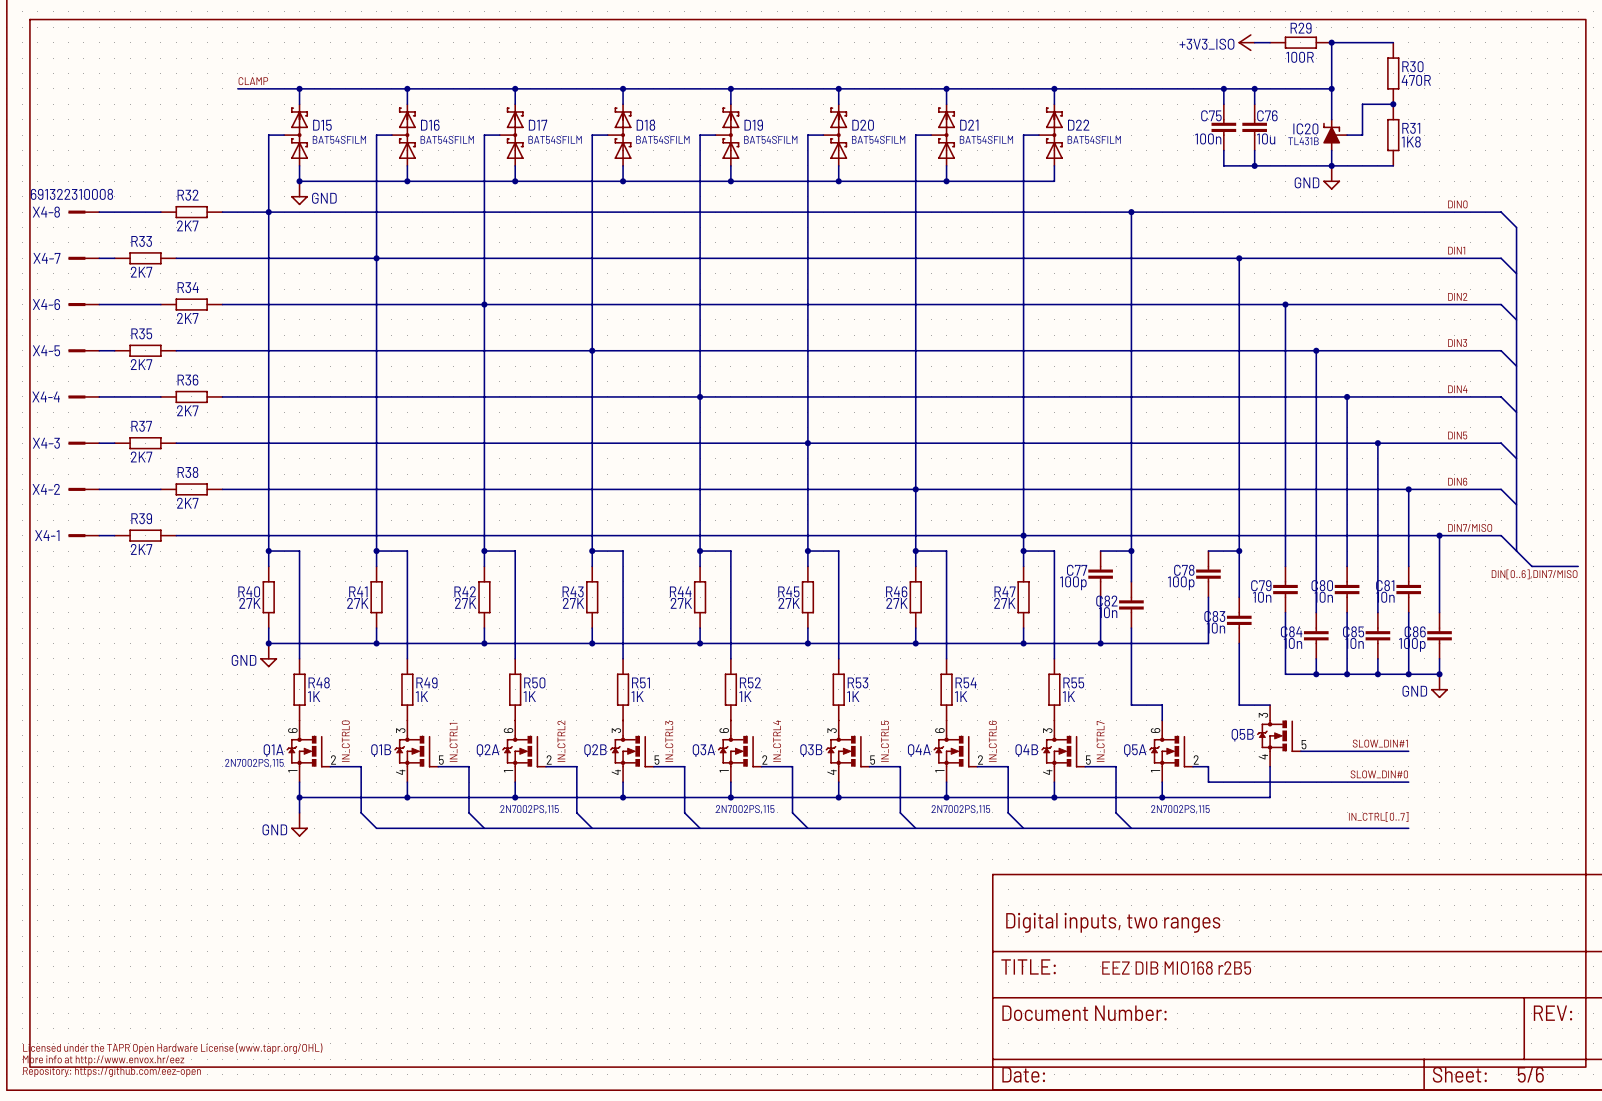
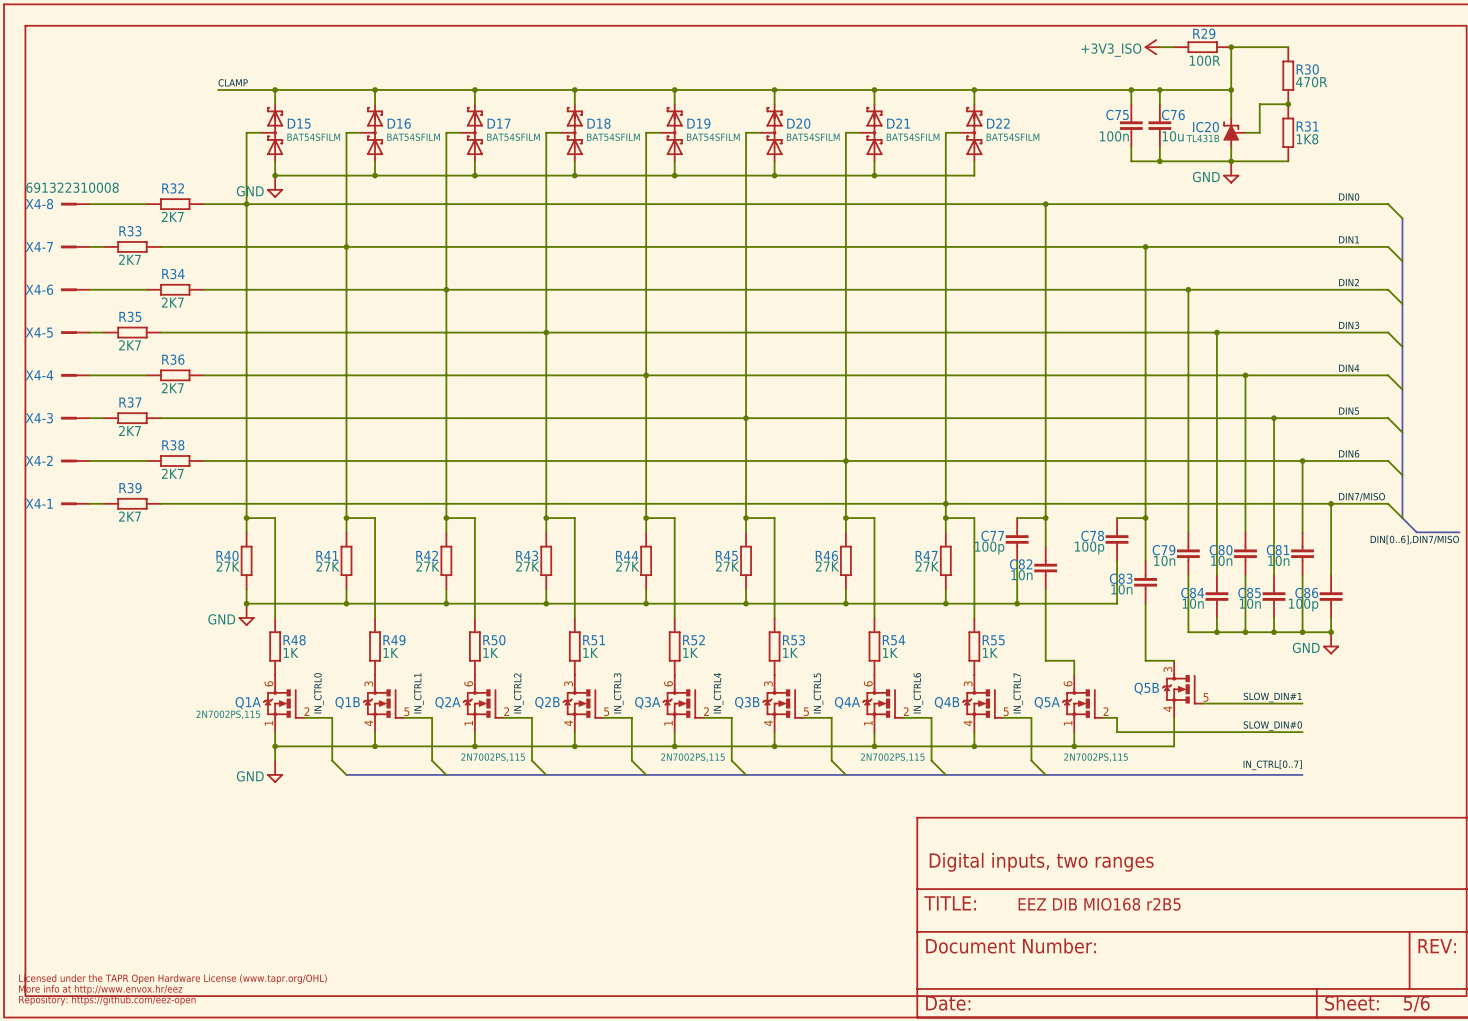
power symbol text position: GND (324, 198) -> GND (250, 191)

